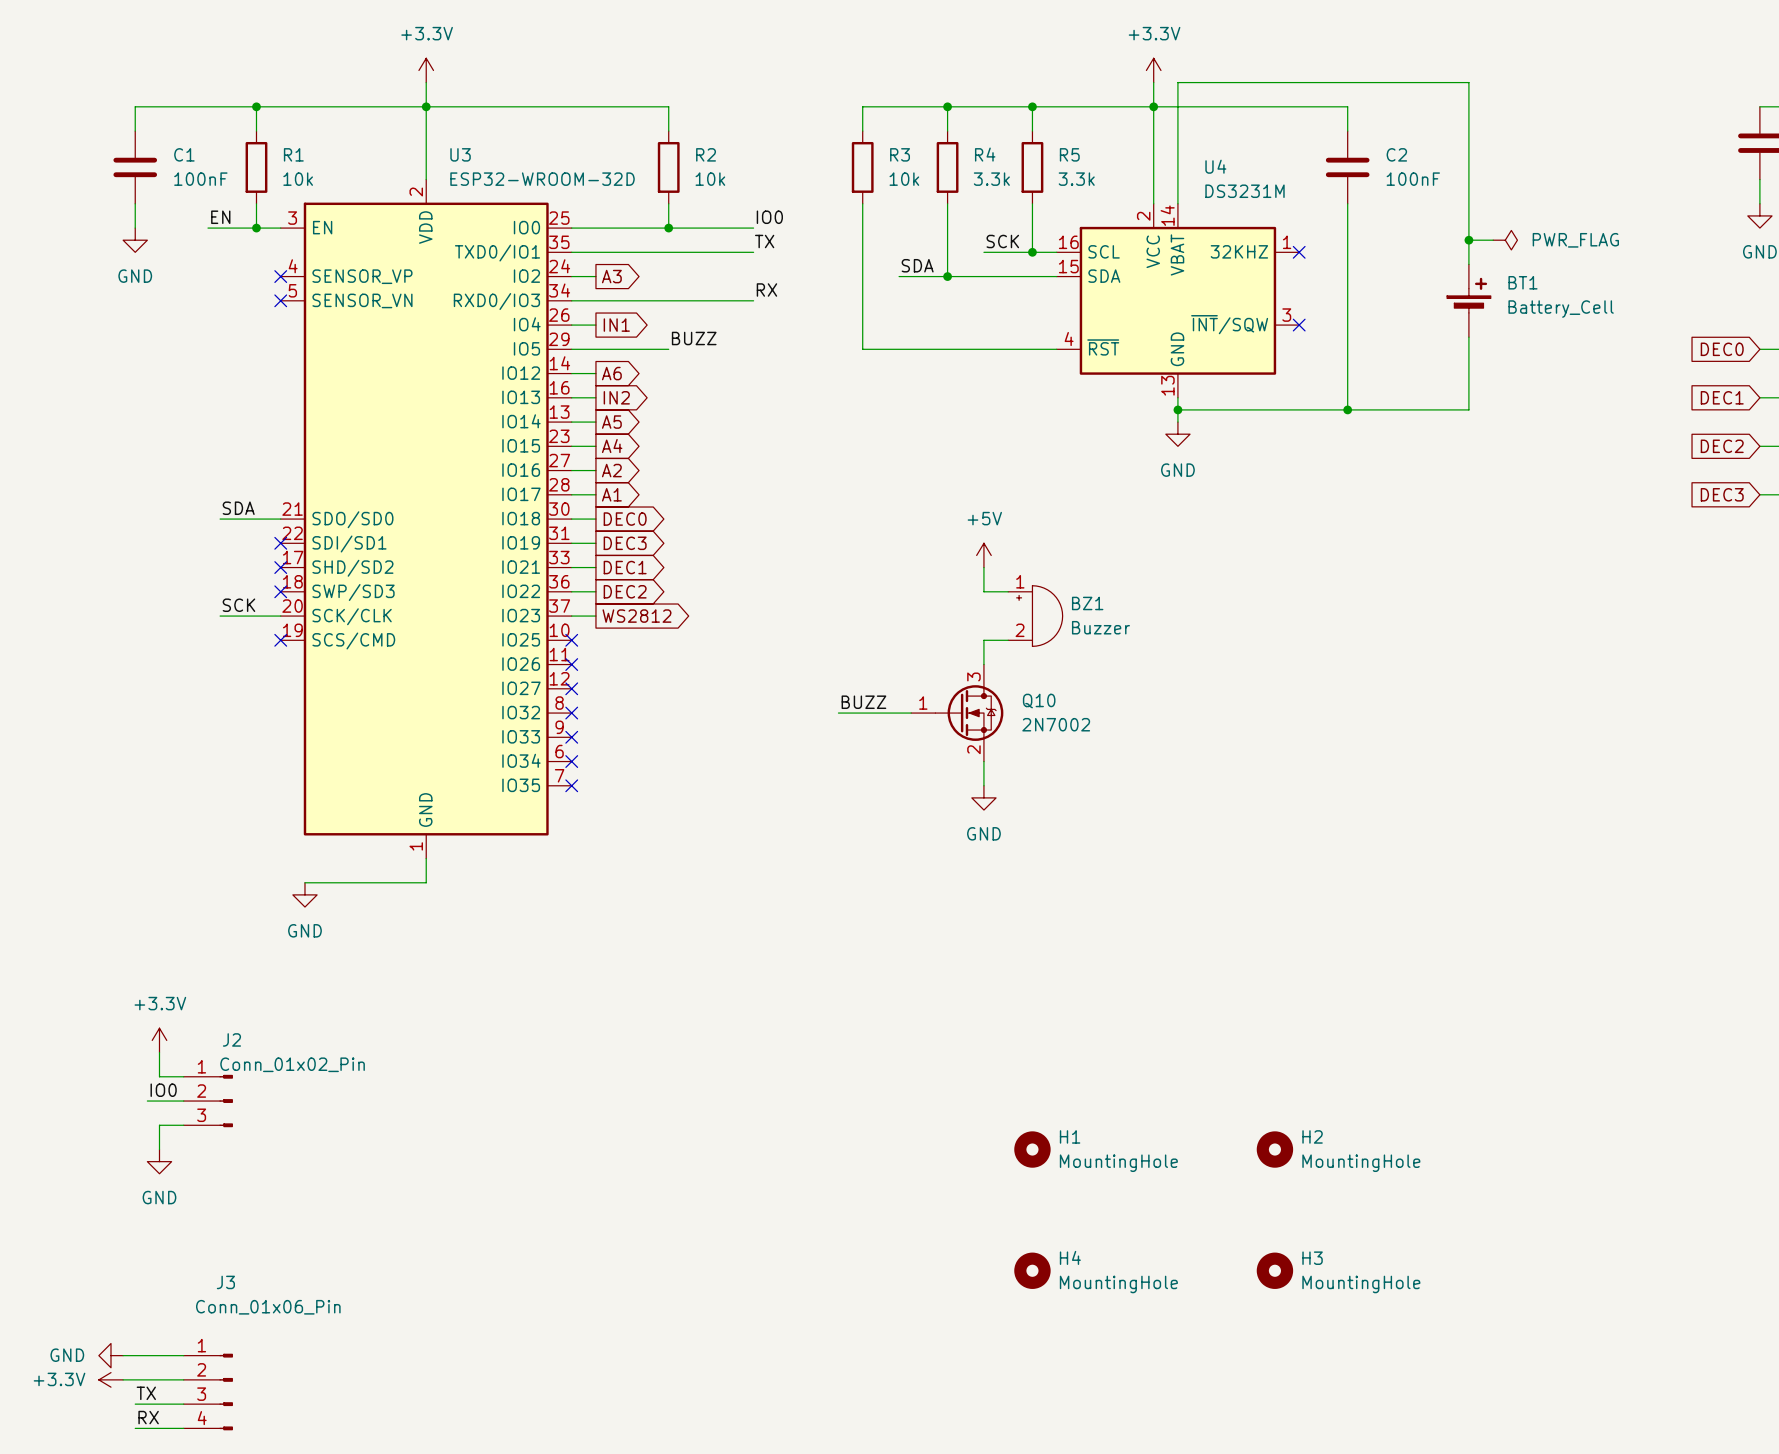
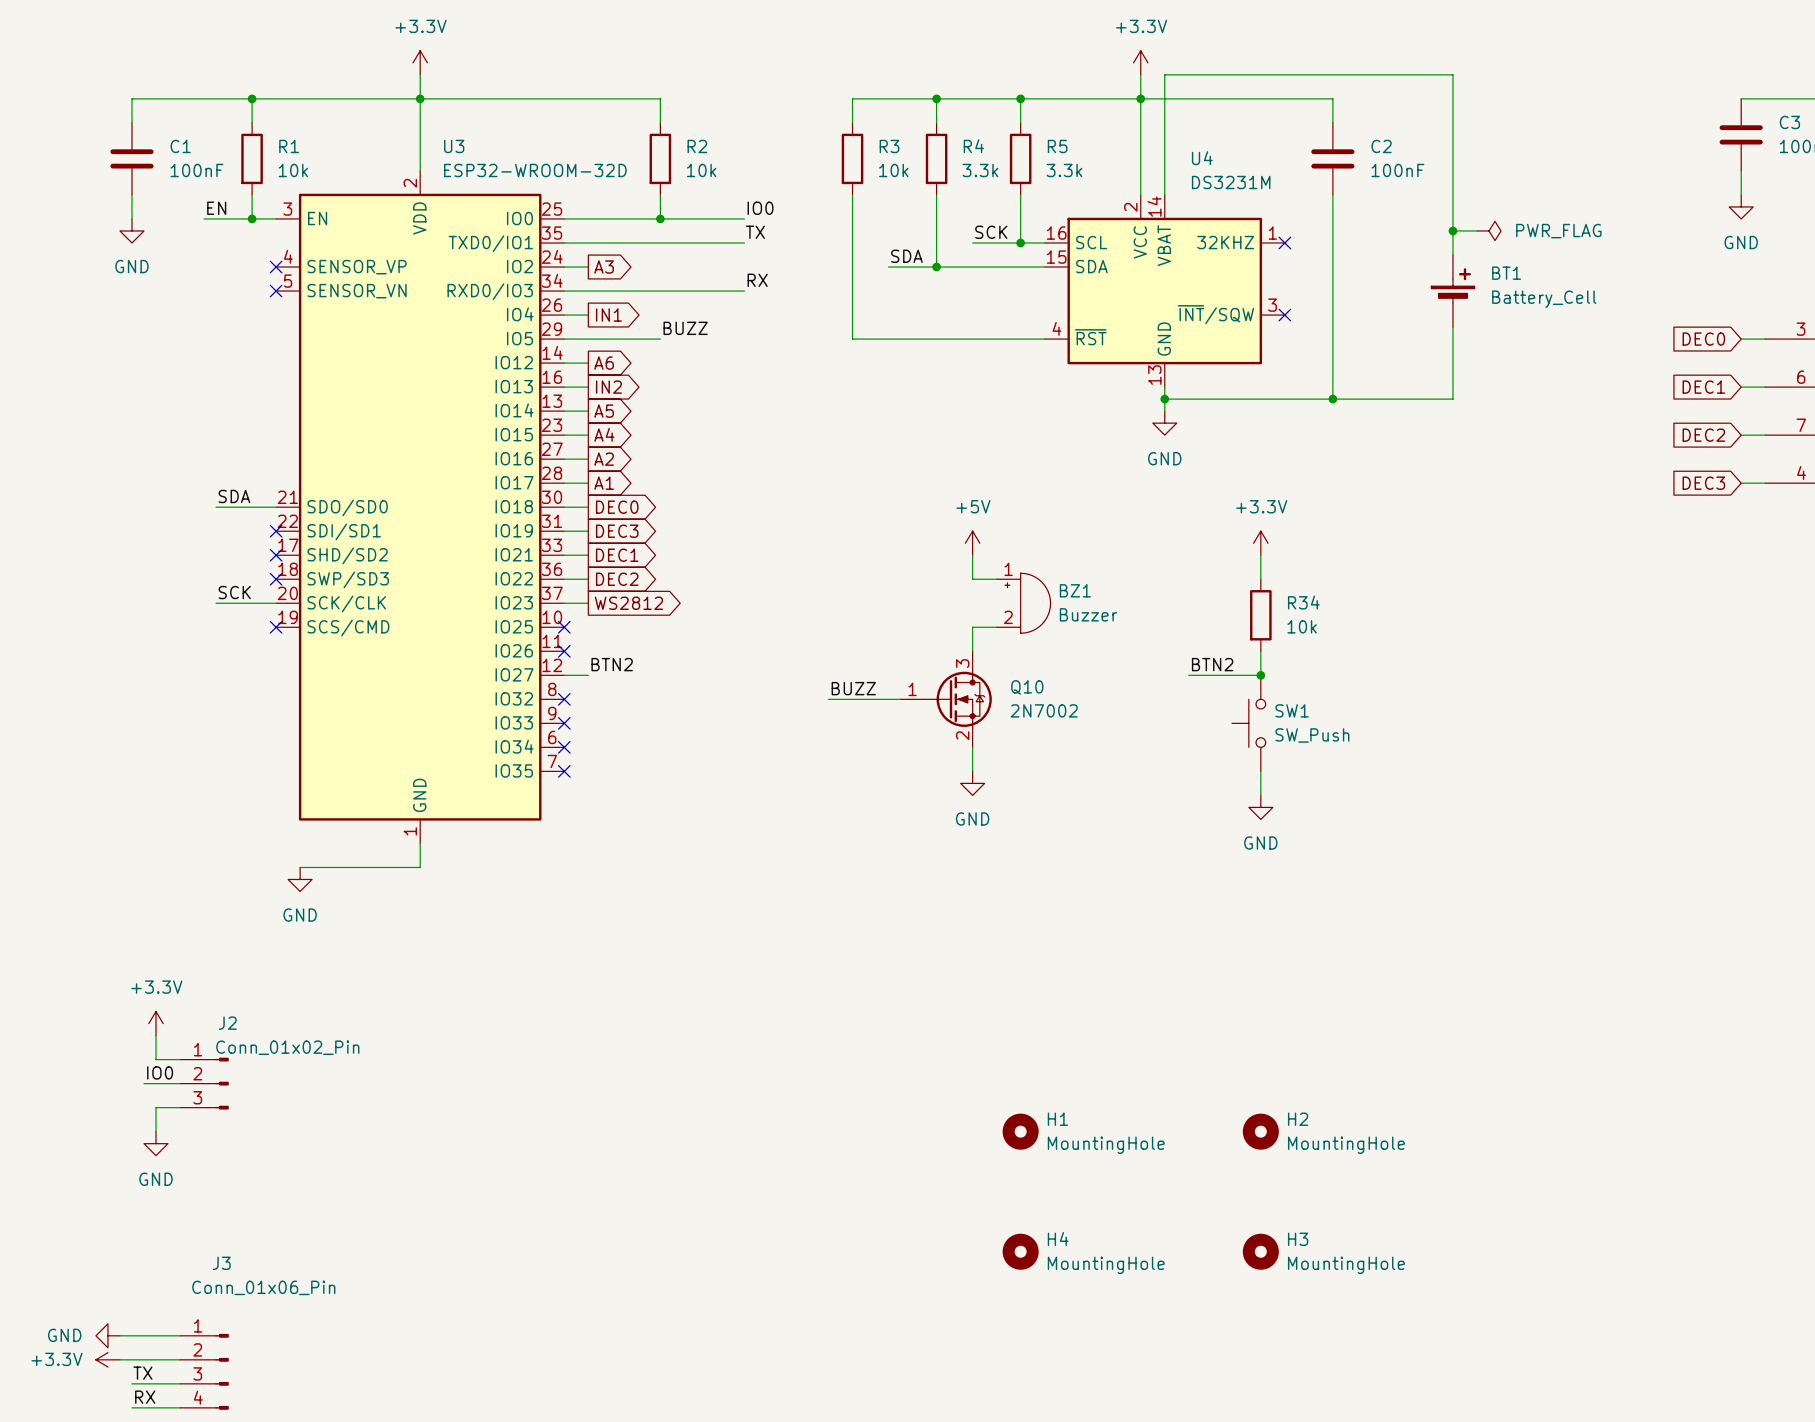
power symbol: none -> +3.3V (1260, 543)
wire: none -> (1260, 555) (1260, 579)
R34: none -> 10k (1260, 615)
wire: none -> (1260, 651) (1260, 675) (1188, 675)
label: none -> BTN2 (612, 664)
label: none -> BTN2 (1212, 664)
wire: none -> (564, 675) (588, 675)
no-connect mark: (571, 688) -> none
junction: none -> (1260, 675)
SW1: none -> SW_Push (1248, 723)
wire: none -> (1260, 771) (1260, 795)
power symbol: none -> GND (1260, 807)

